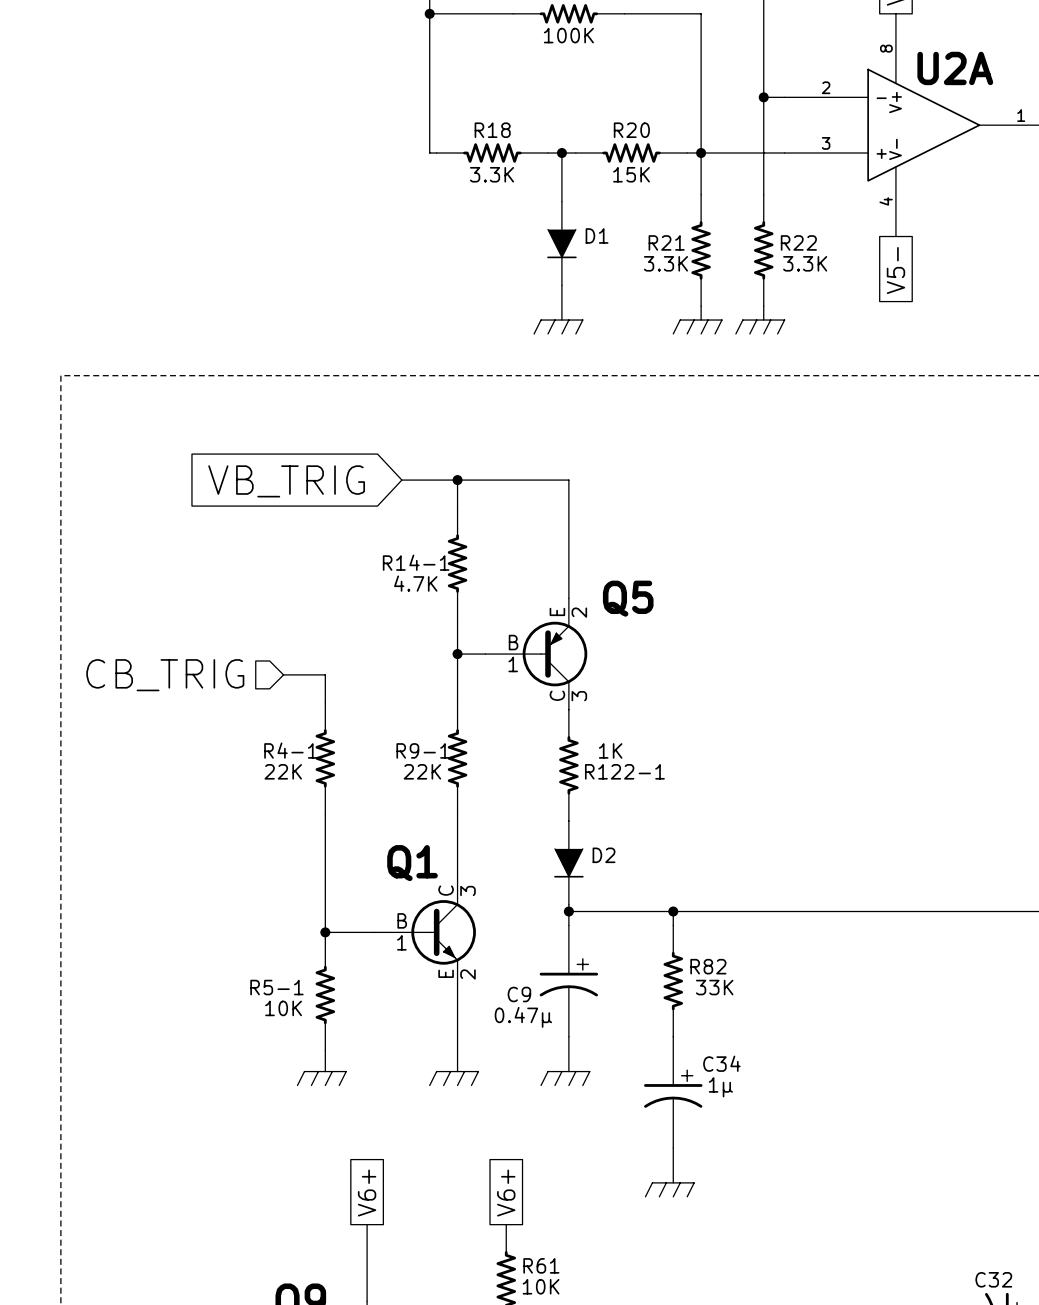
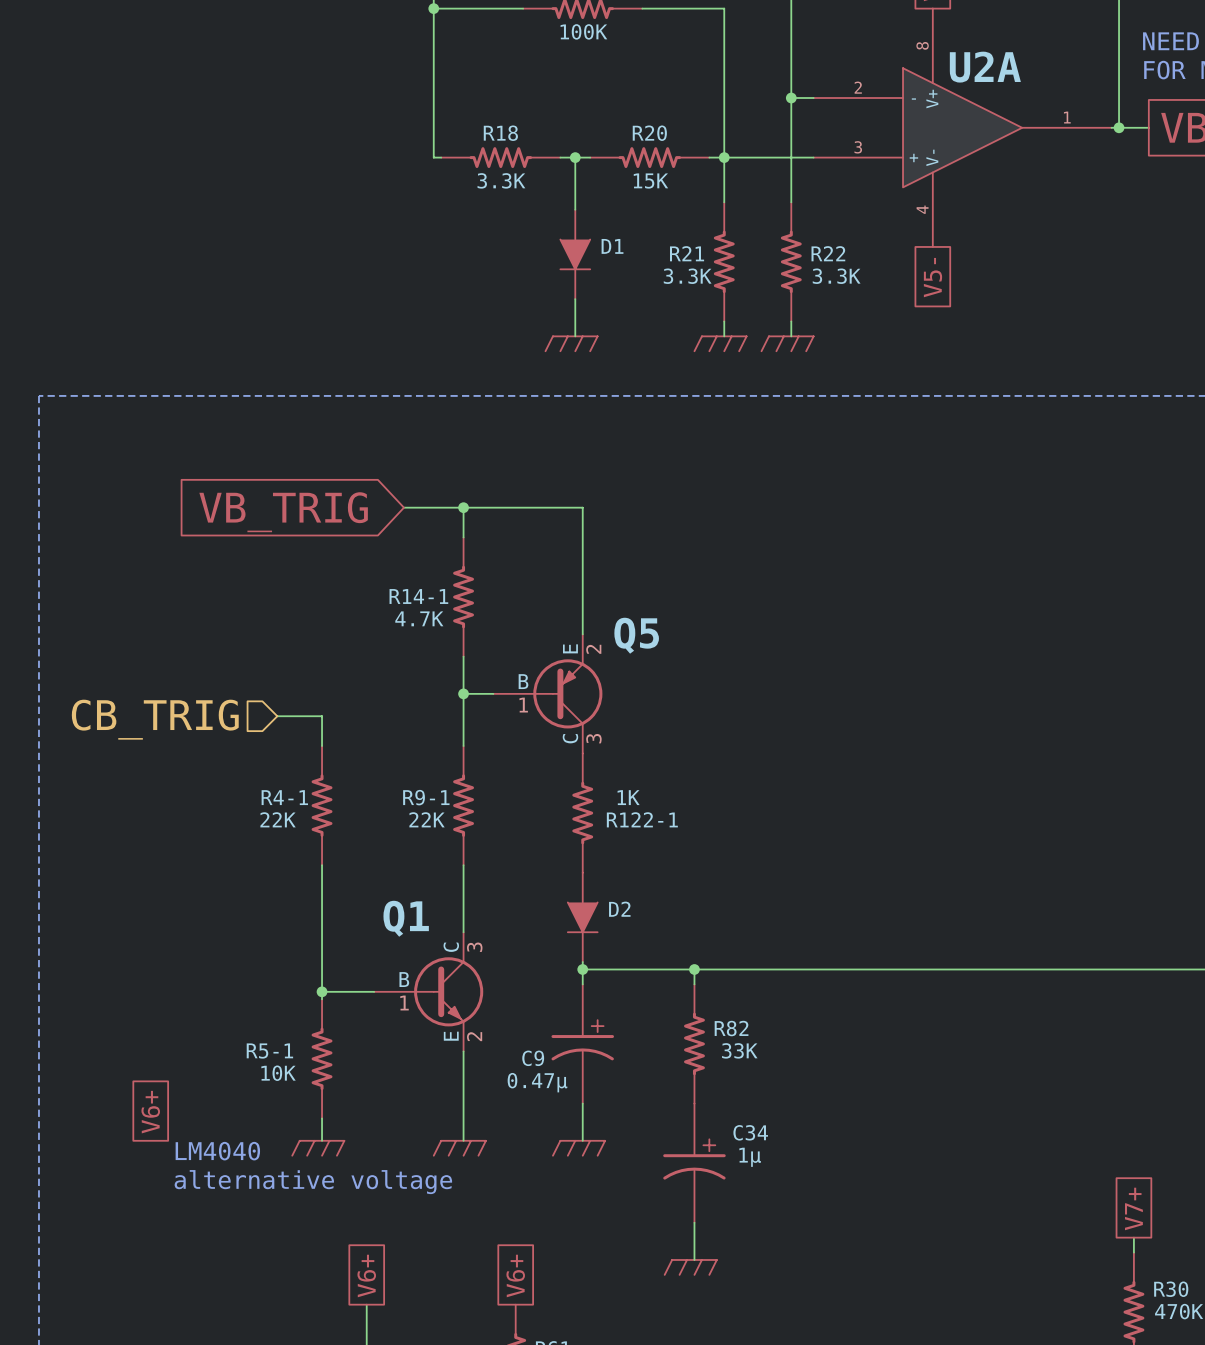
global label: none -> V6+ (150, 1112)
text: none -> LM4040 (217, 1151)
text: none -> alternative voltage (313, 1182)

